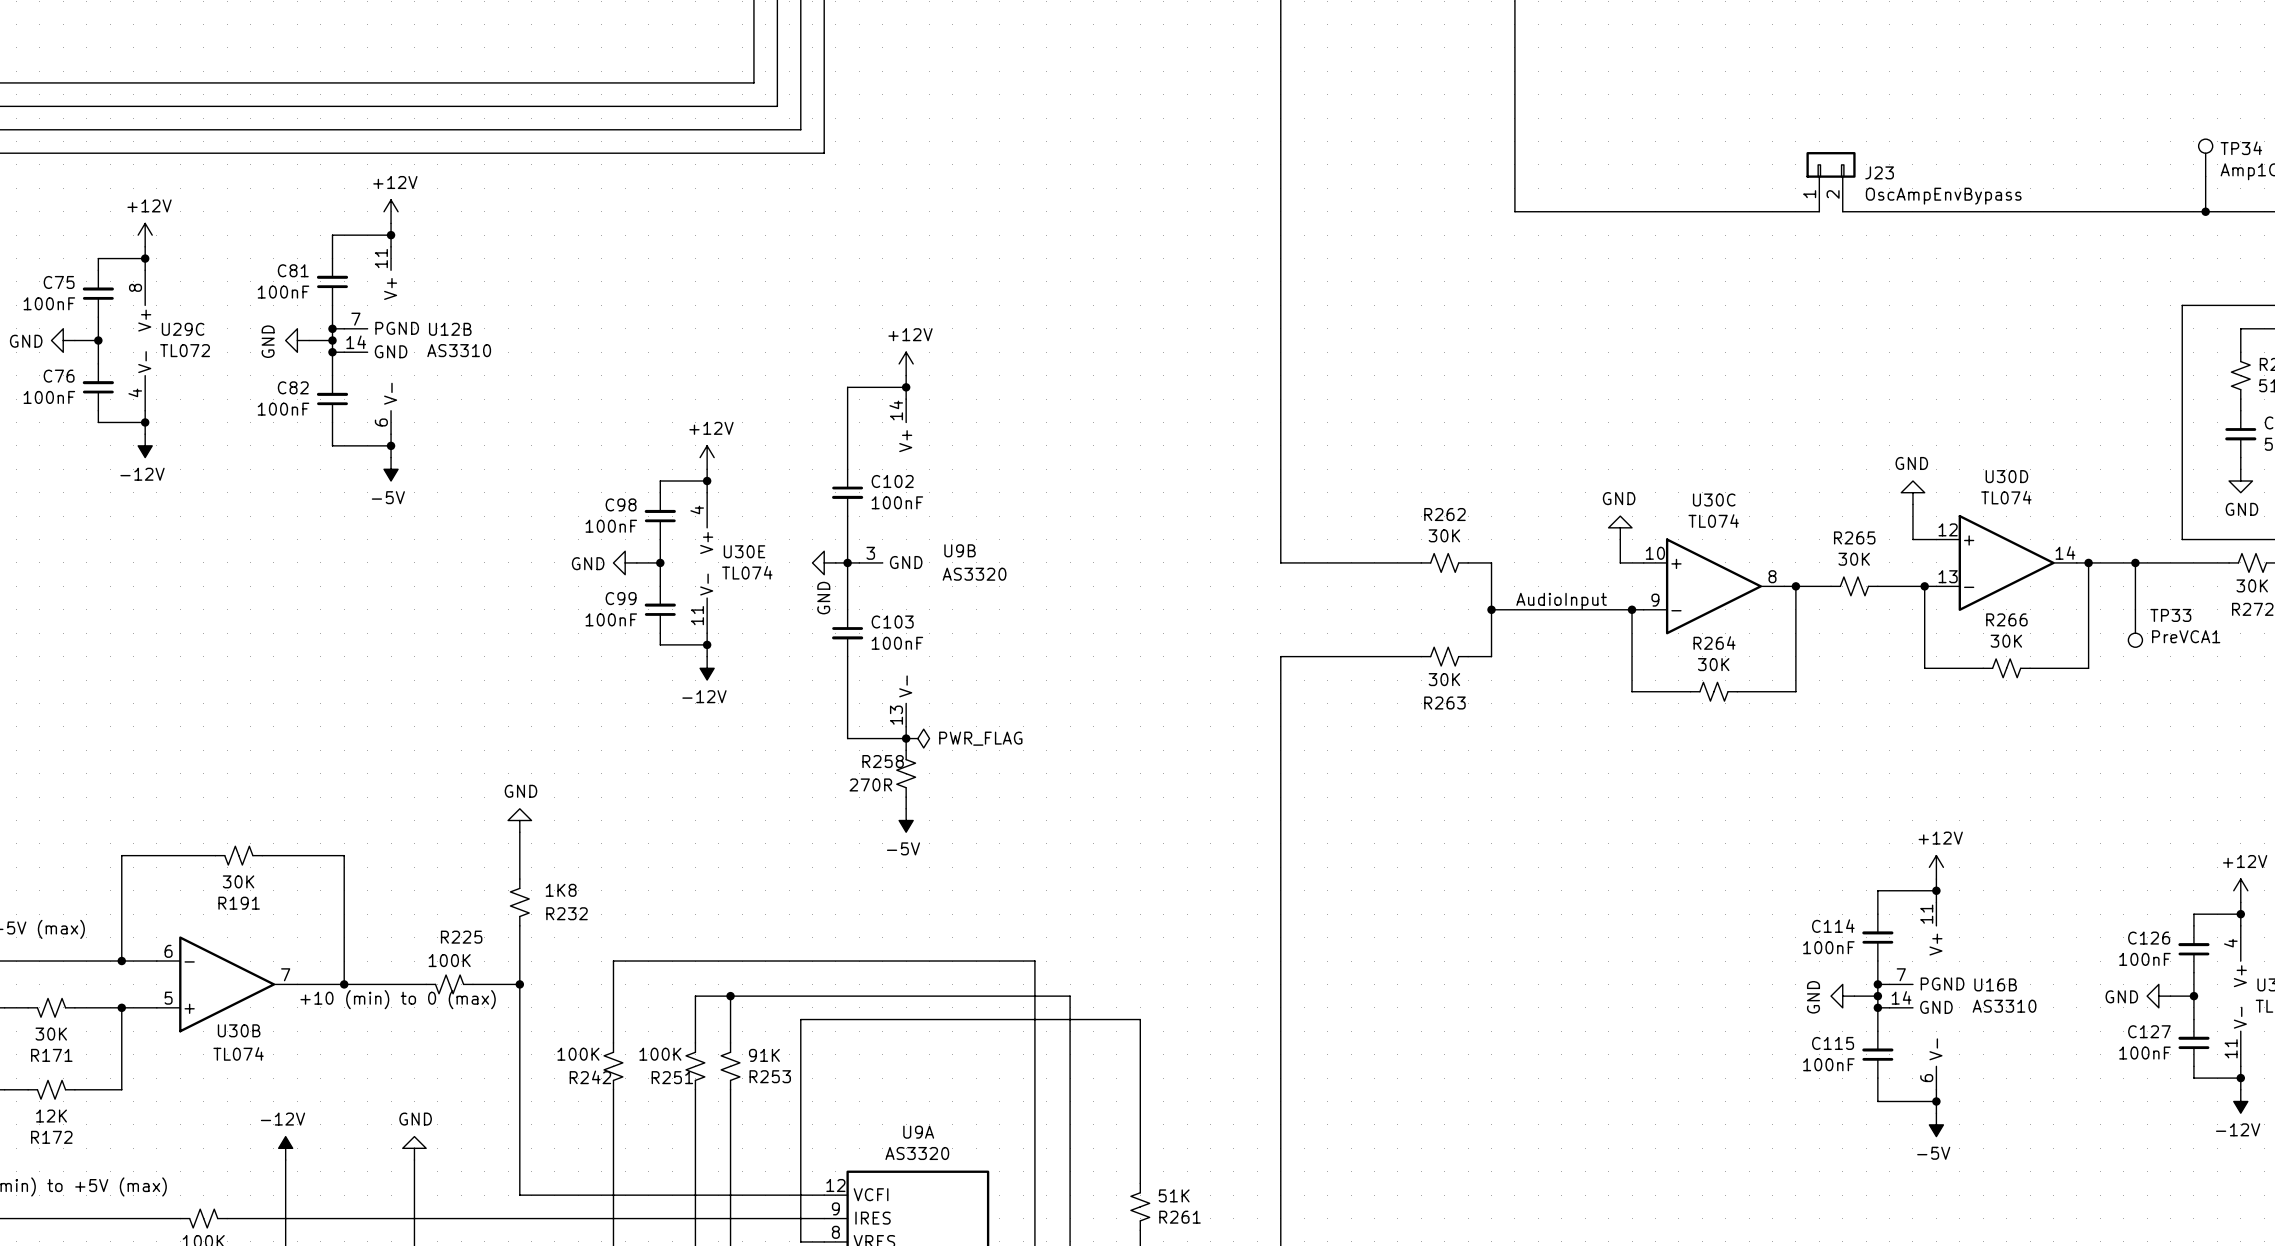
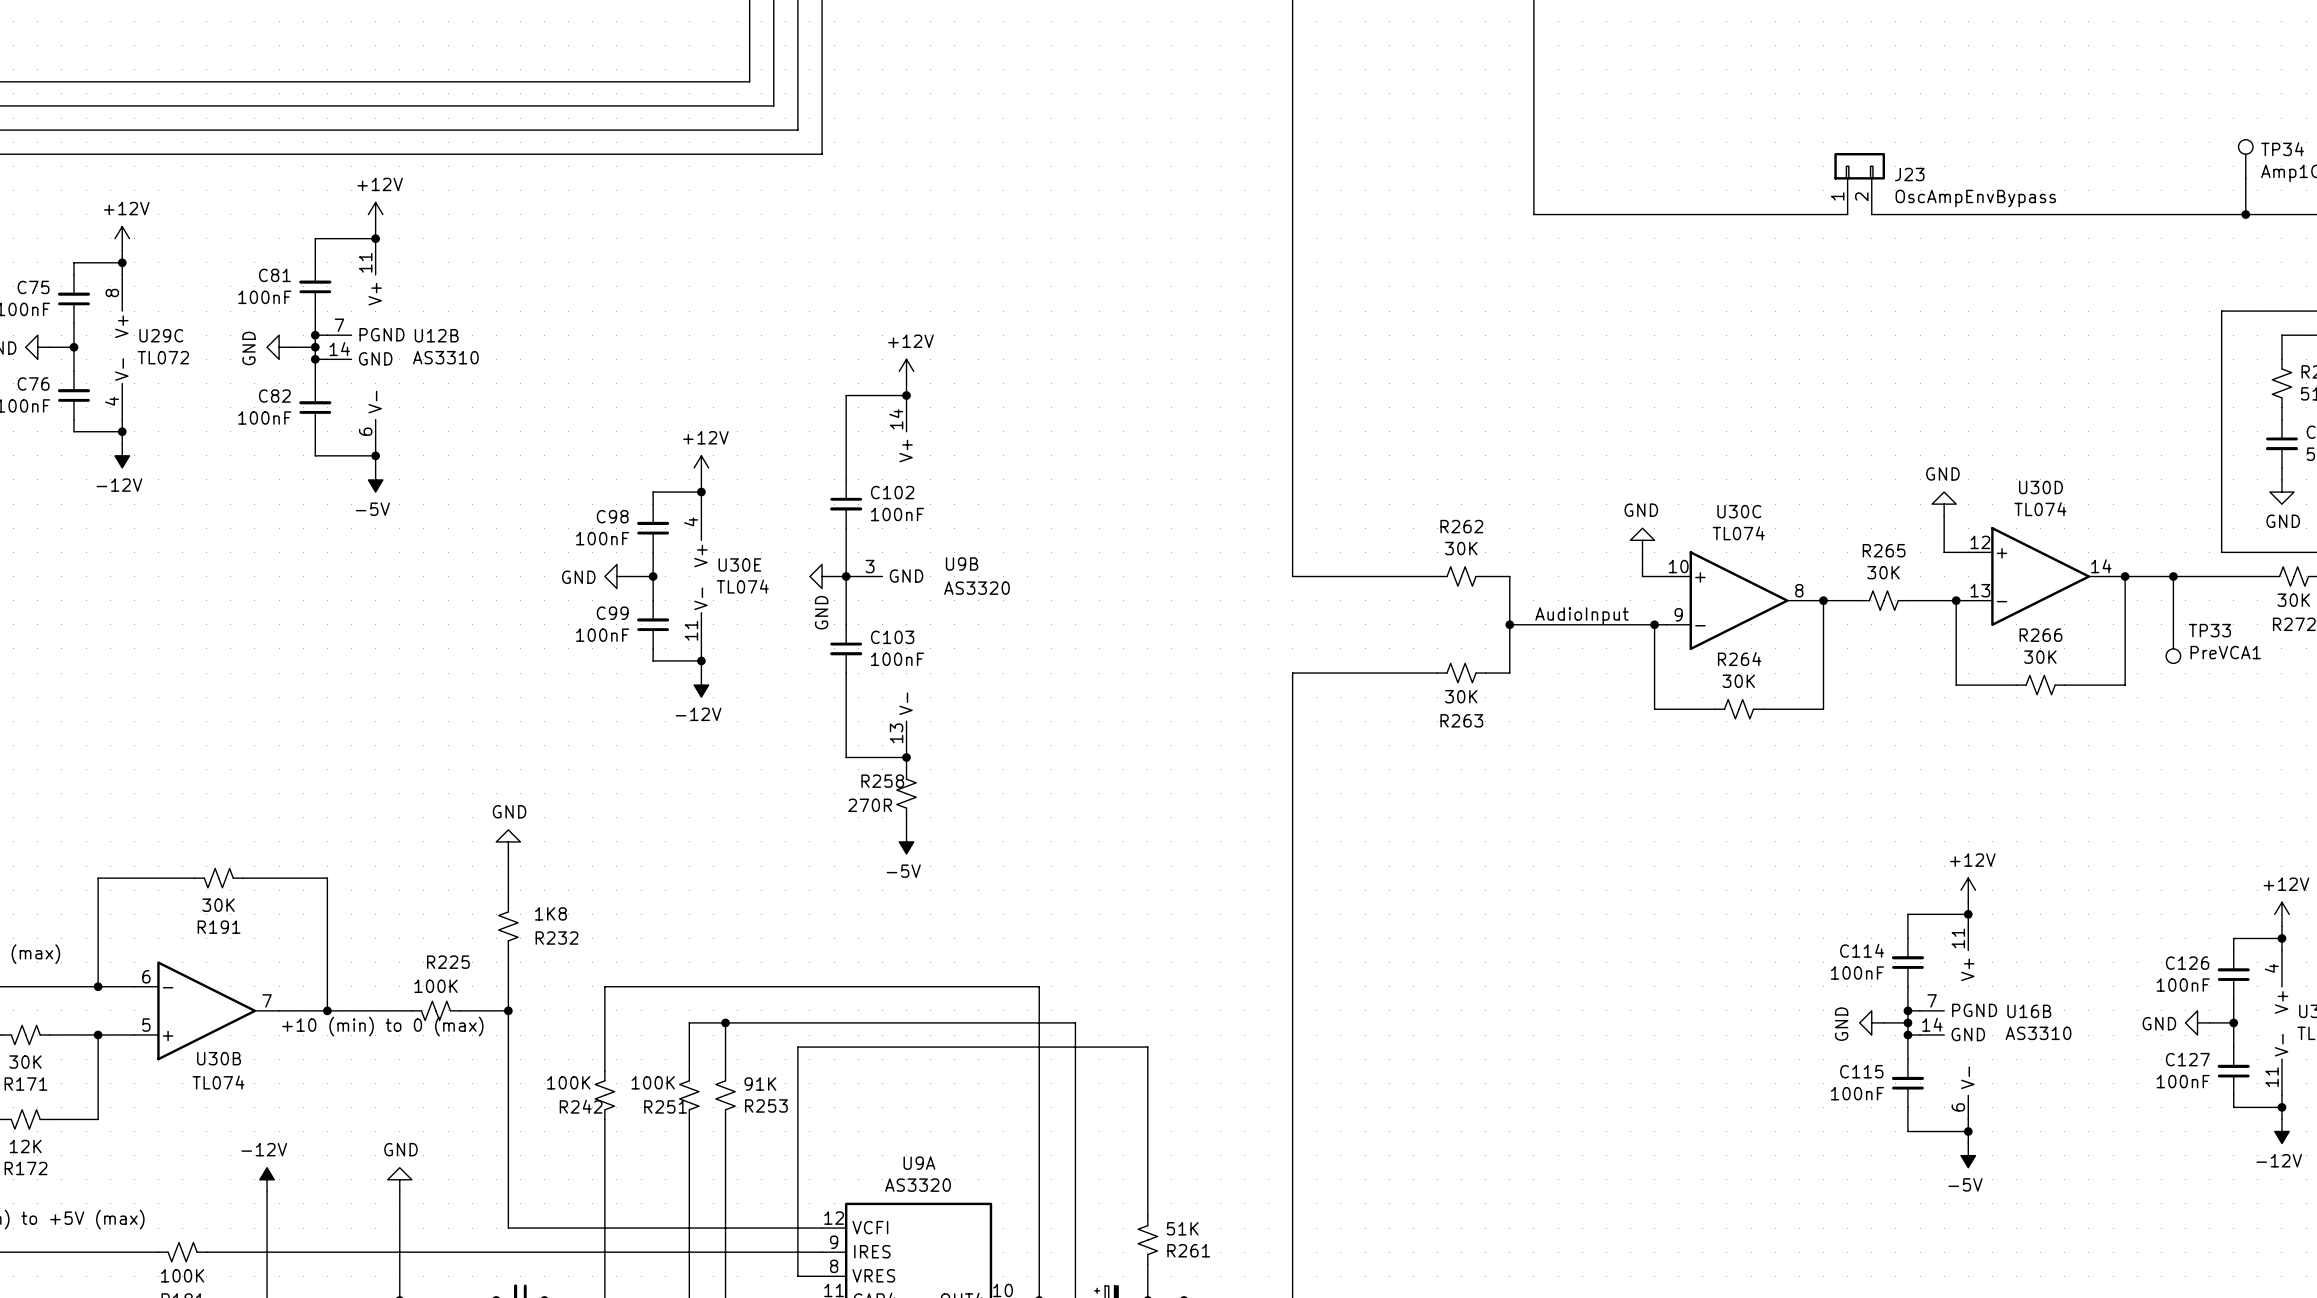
power symbol: PWR_FLAG (917, 738) -> none

